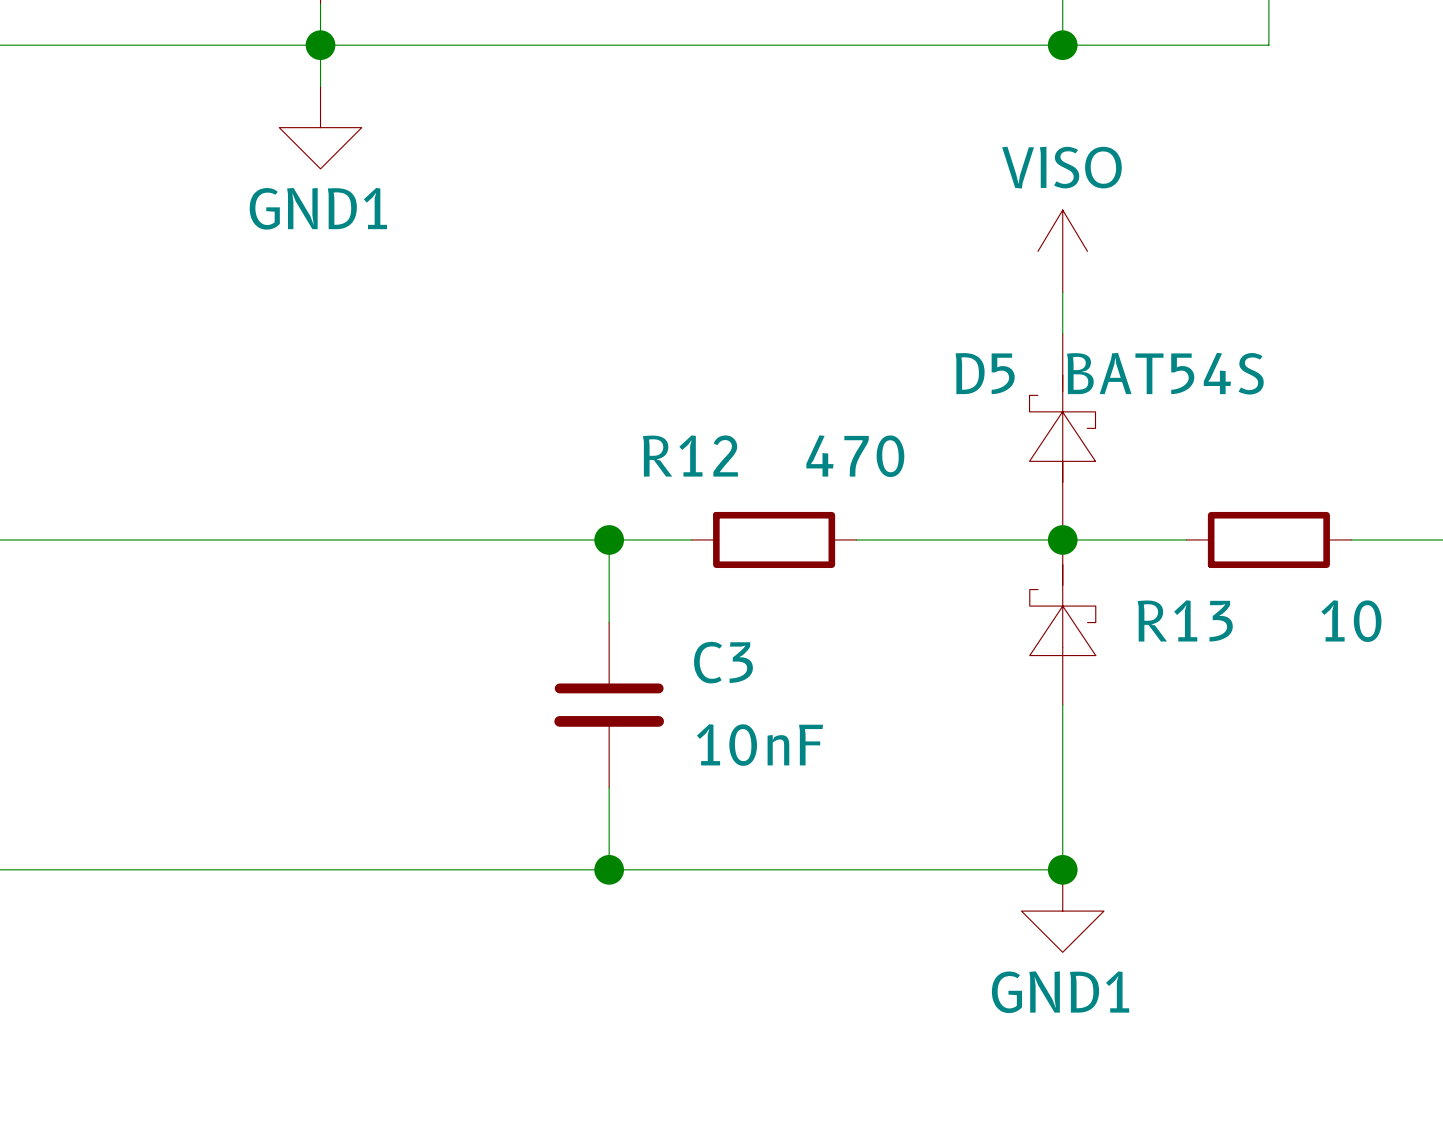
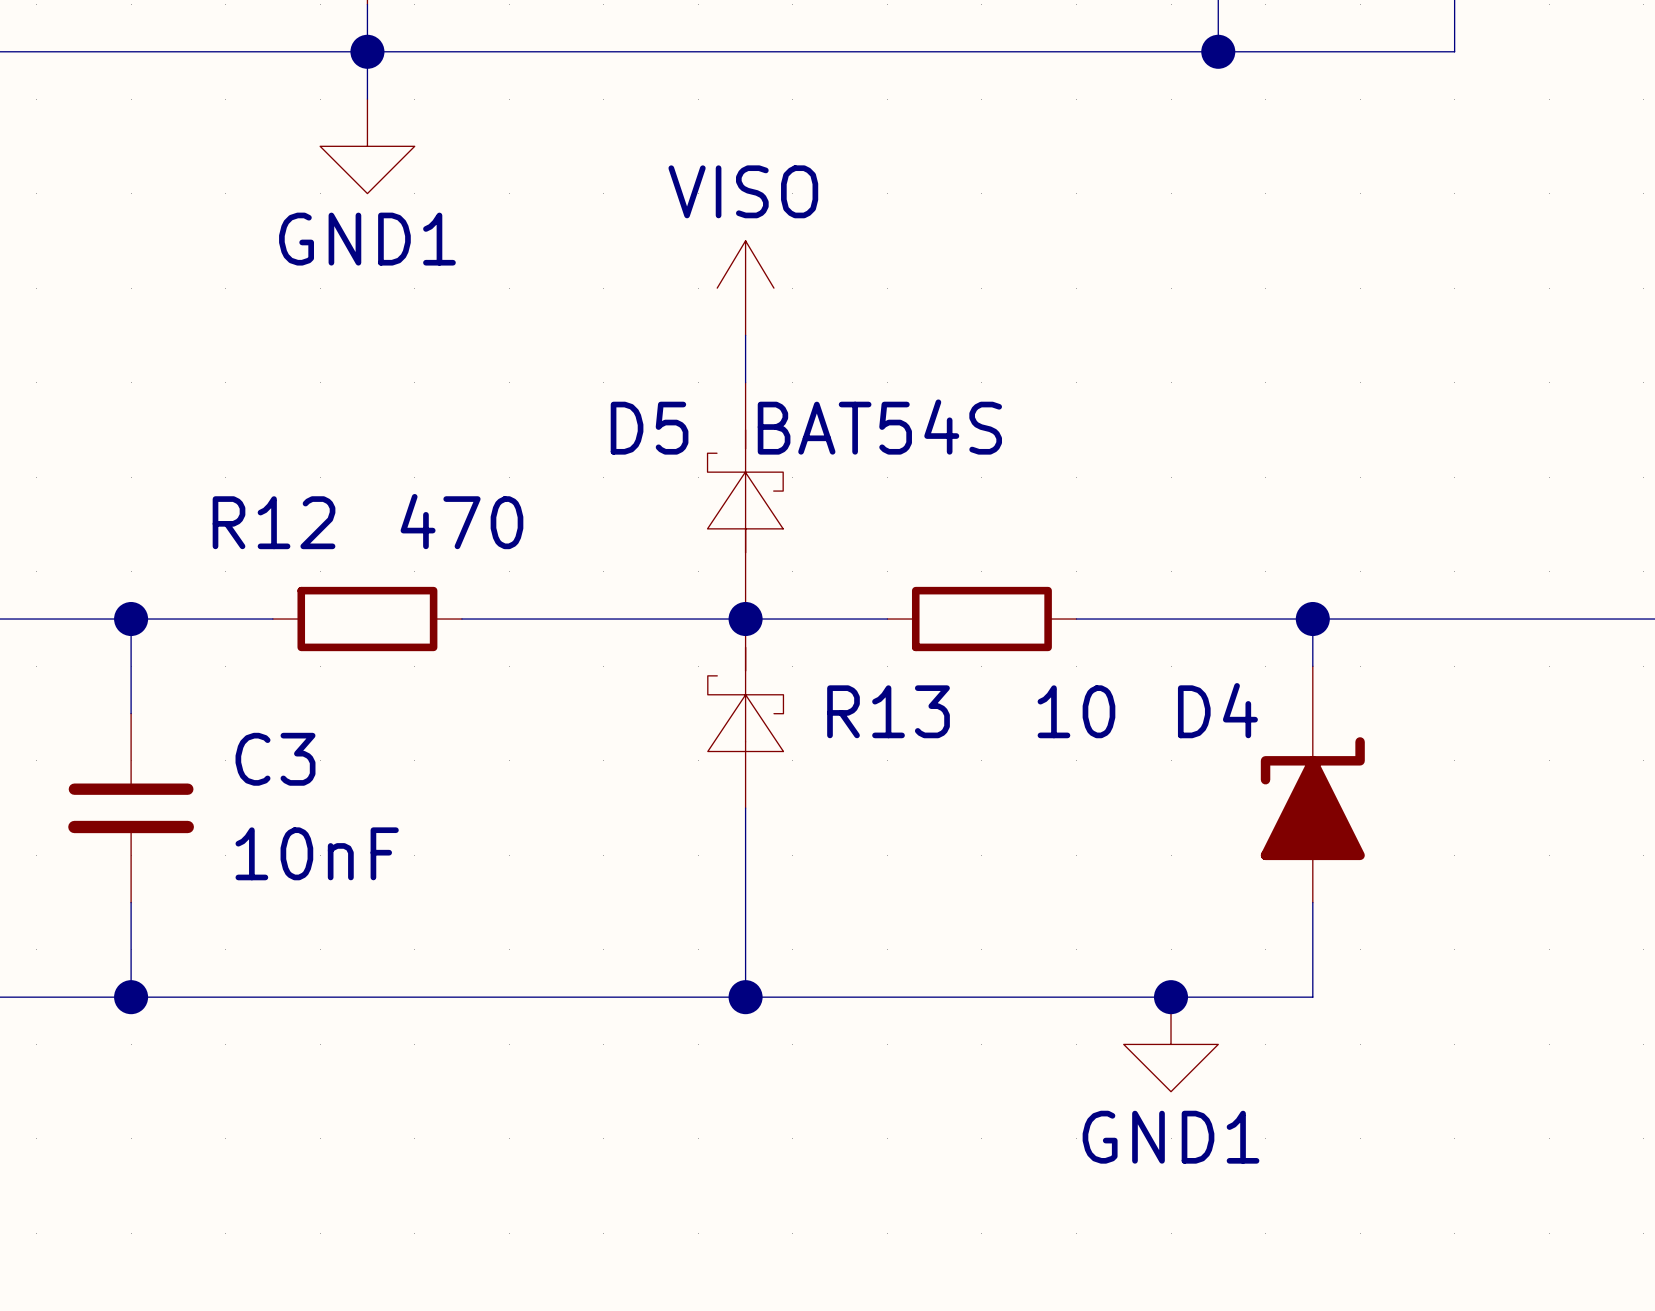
power symbol position: VISO (1062, 251) -> VISO (745, 288)
wire: (1062, 292) (1062, 333) -> (745, 335) (745, 382)
D5 position: (1062, 519) -> (745, 595)
junction: none -> (131, 619)
wire: (238, 539) (402, 539) -> none
wire: (609, 539) (609, 622) -> (131, 619) (131, 713)
junction position: (609, 539) -> (745, 619)
R12 position: (774, 539) -> (367, 619)
wire: (856, 539) (939, 539) -> (792, 619) (887, 619)
junction position: (1062, 539) -> (1312, 619)
wire: none -> (1312, 619) (1312, 666)
wire: none -> (1360, 619) (1549, 619)
R13 position: (1268, 539) -> (981, 619)
D4: none -> (1312, 784)
C3 position: (609, 704) -> (131, 808)
wire: none -> (745, 808) (745, 997)
wire: (1062, 704) (1062, 869) -> (1312, 902) (1312, 997) (1218, 997)
wire: (609, 787) (609, 869) -> (131, 902) (131, 997)
junction: none -> (131, 997)
junction position: (609, 869) -> (745, 997)
junction position: (1062, 869) -> (1171, 997)
power symbol position: GND1 (1062, 911) -> GND1 (1171, 1044)

